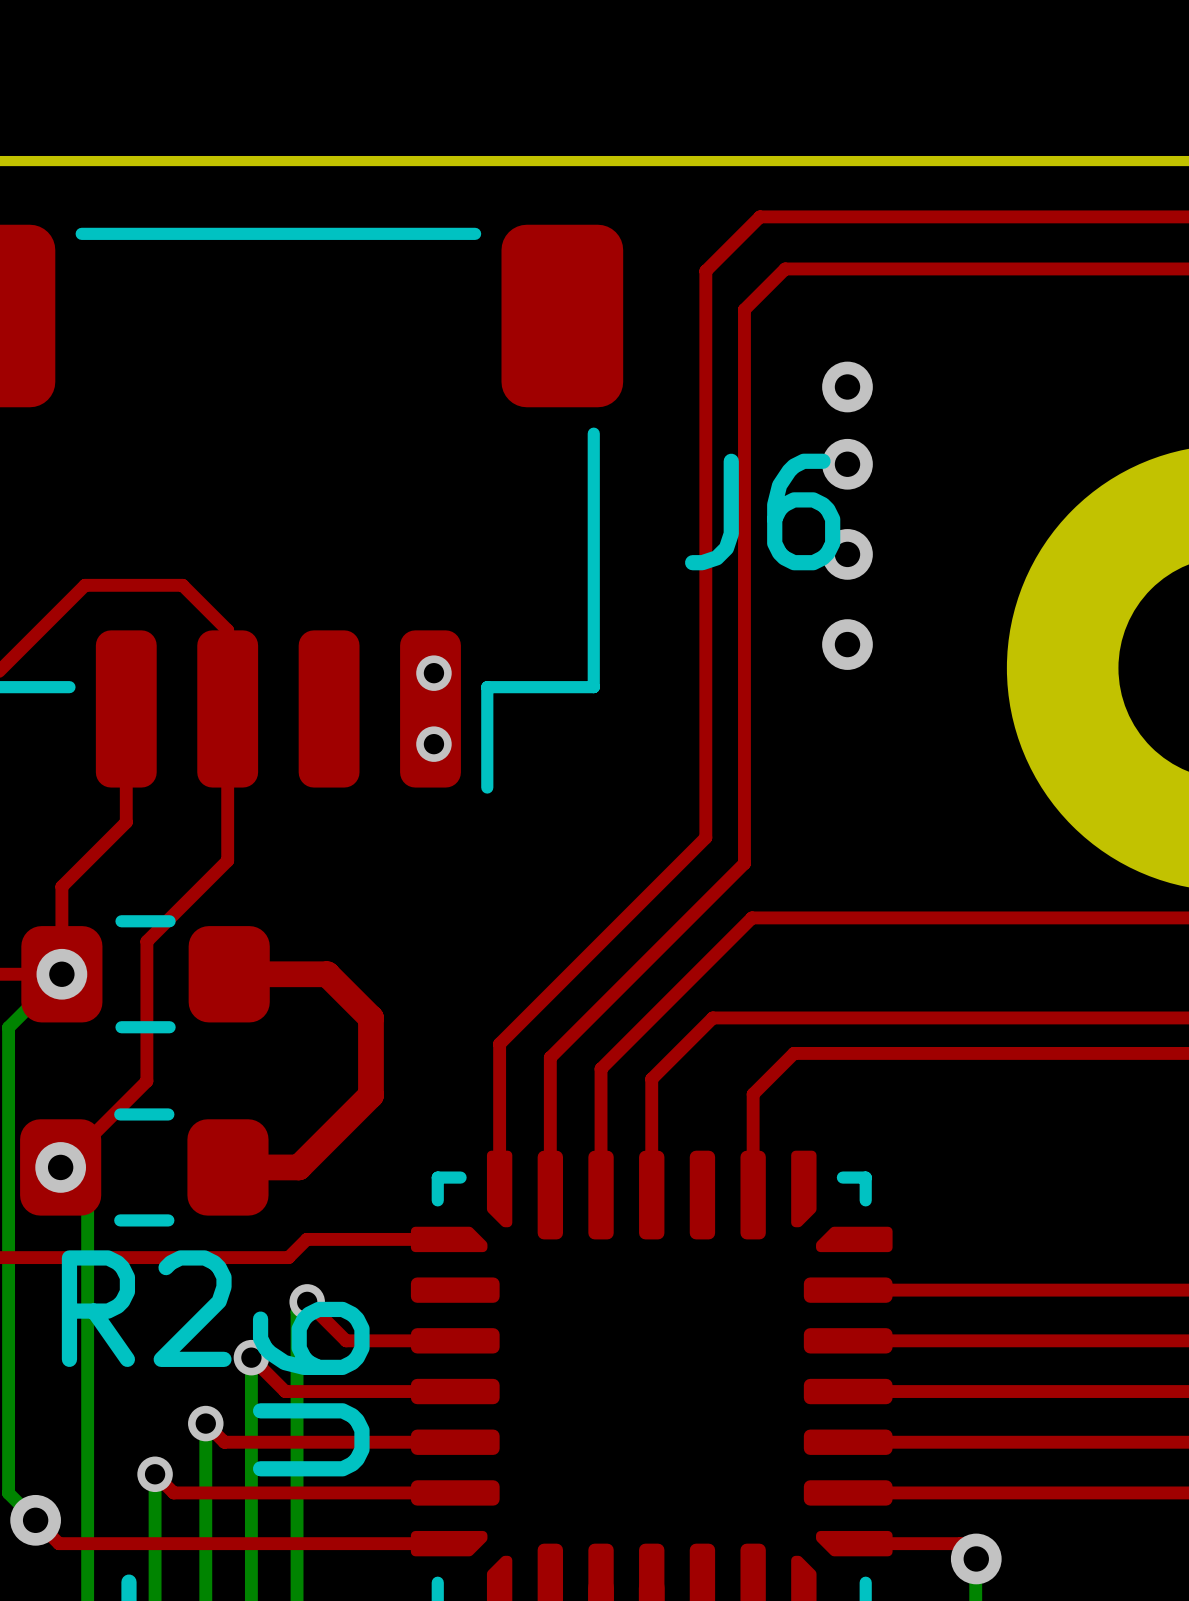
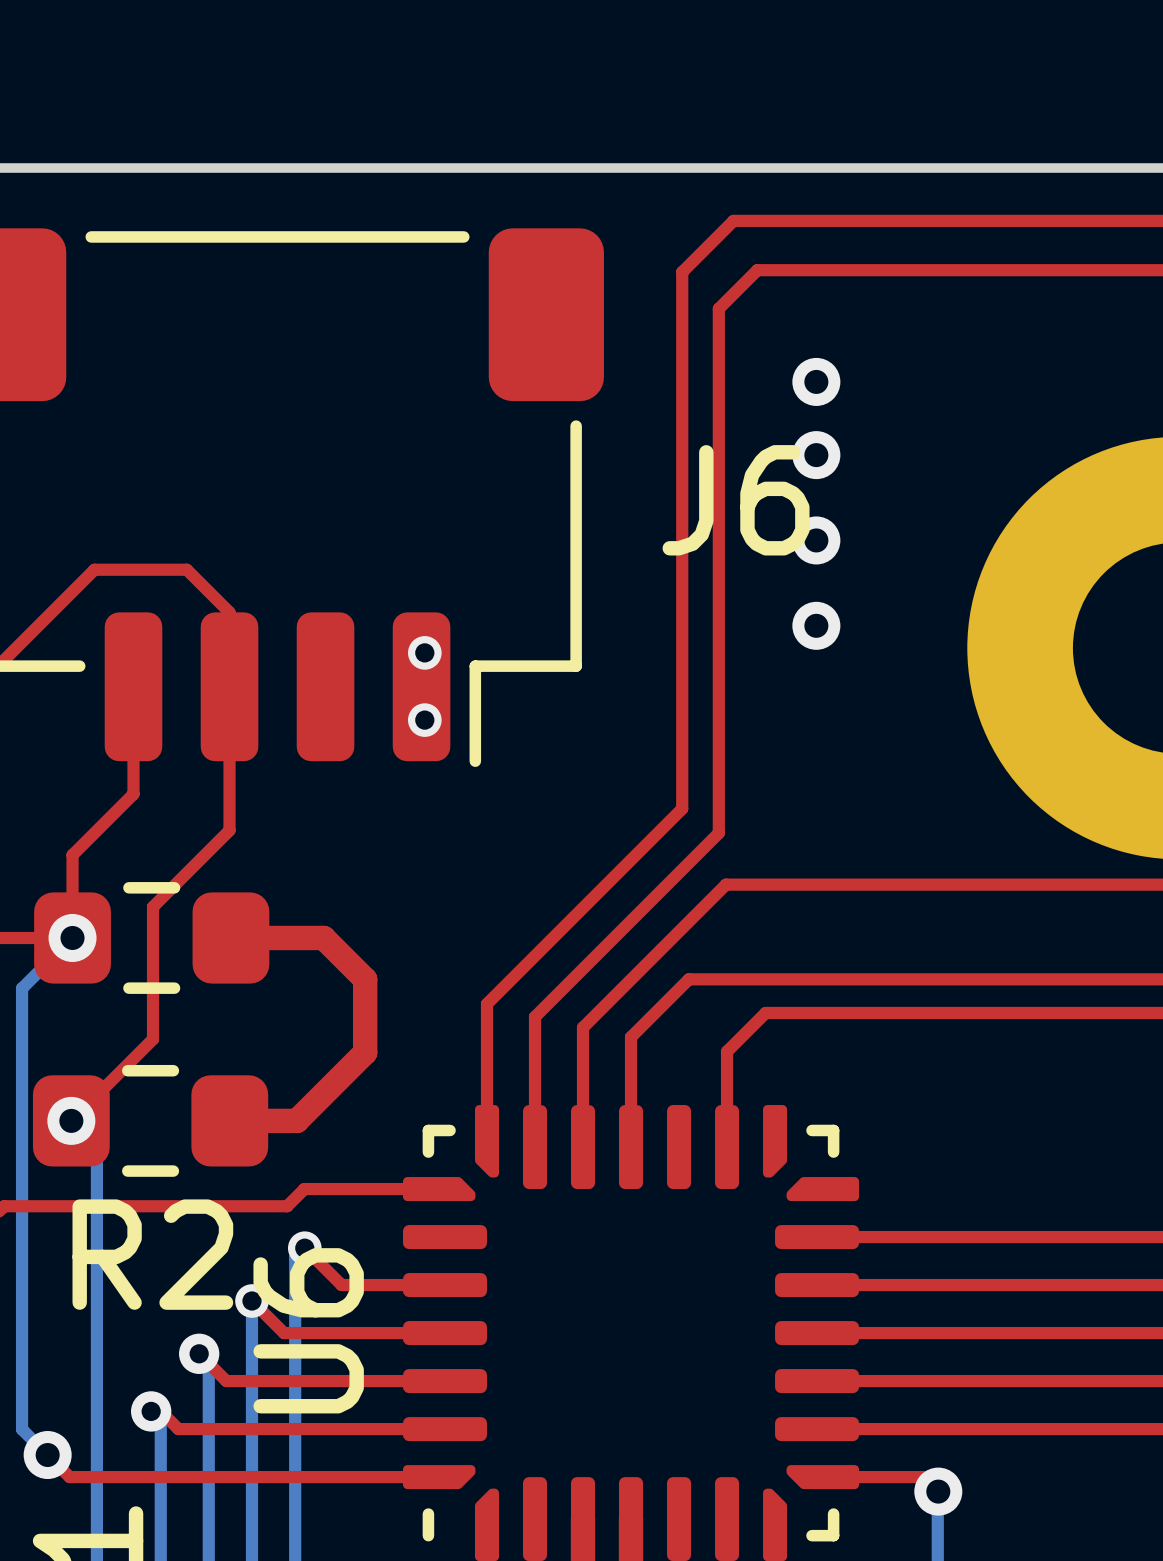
via position: (205, 1423) -> (199, 1353)
via size: [137, 1456, 173, 1493] -> [131, 1391, 172, 1432]

